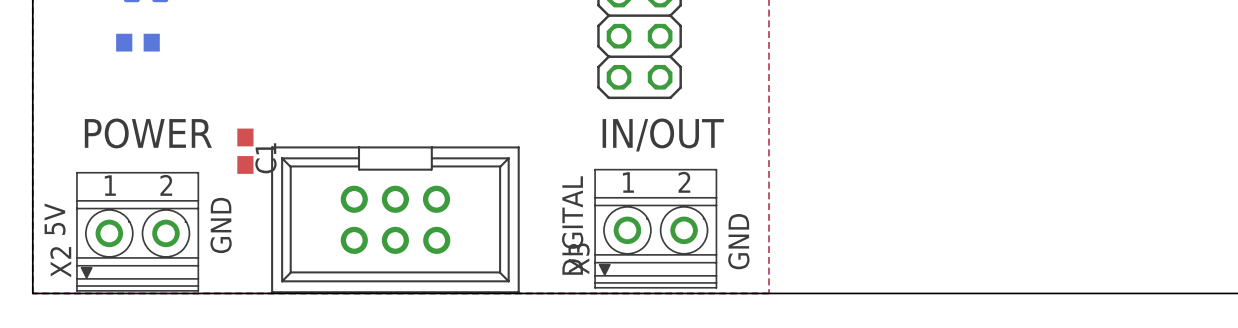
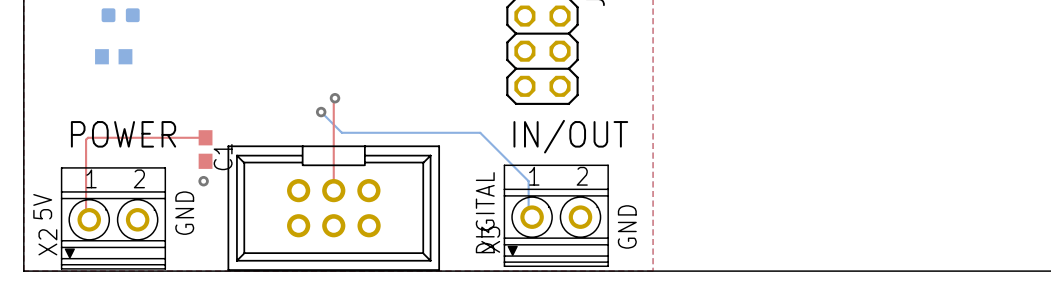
top track: none -> (335, 98) (333, 190)
via: none -> (335, 98)
bottom track: none -> (321, 112) (341, 132) (480, 132) (528, 181) (528, 213) (532, 217)
via: none -> (321, 112)
top track: none -> (205, 137) (88, 137) (86, 139) (86, 216) (89, 219)
via: none -> (203, 181)

